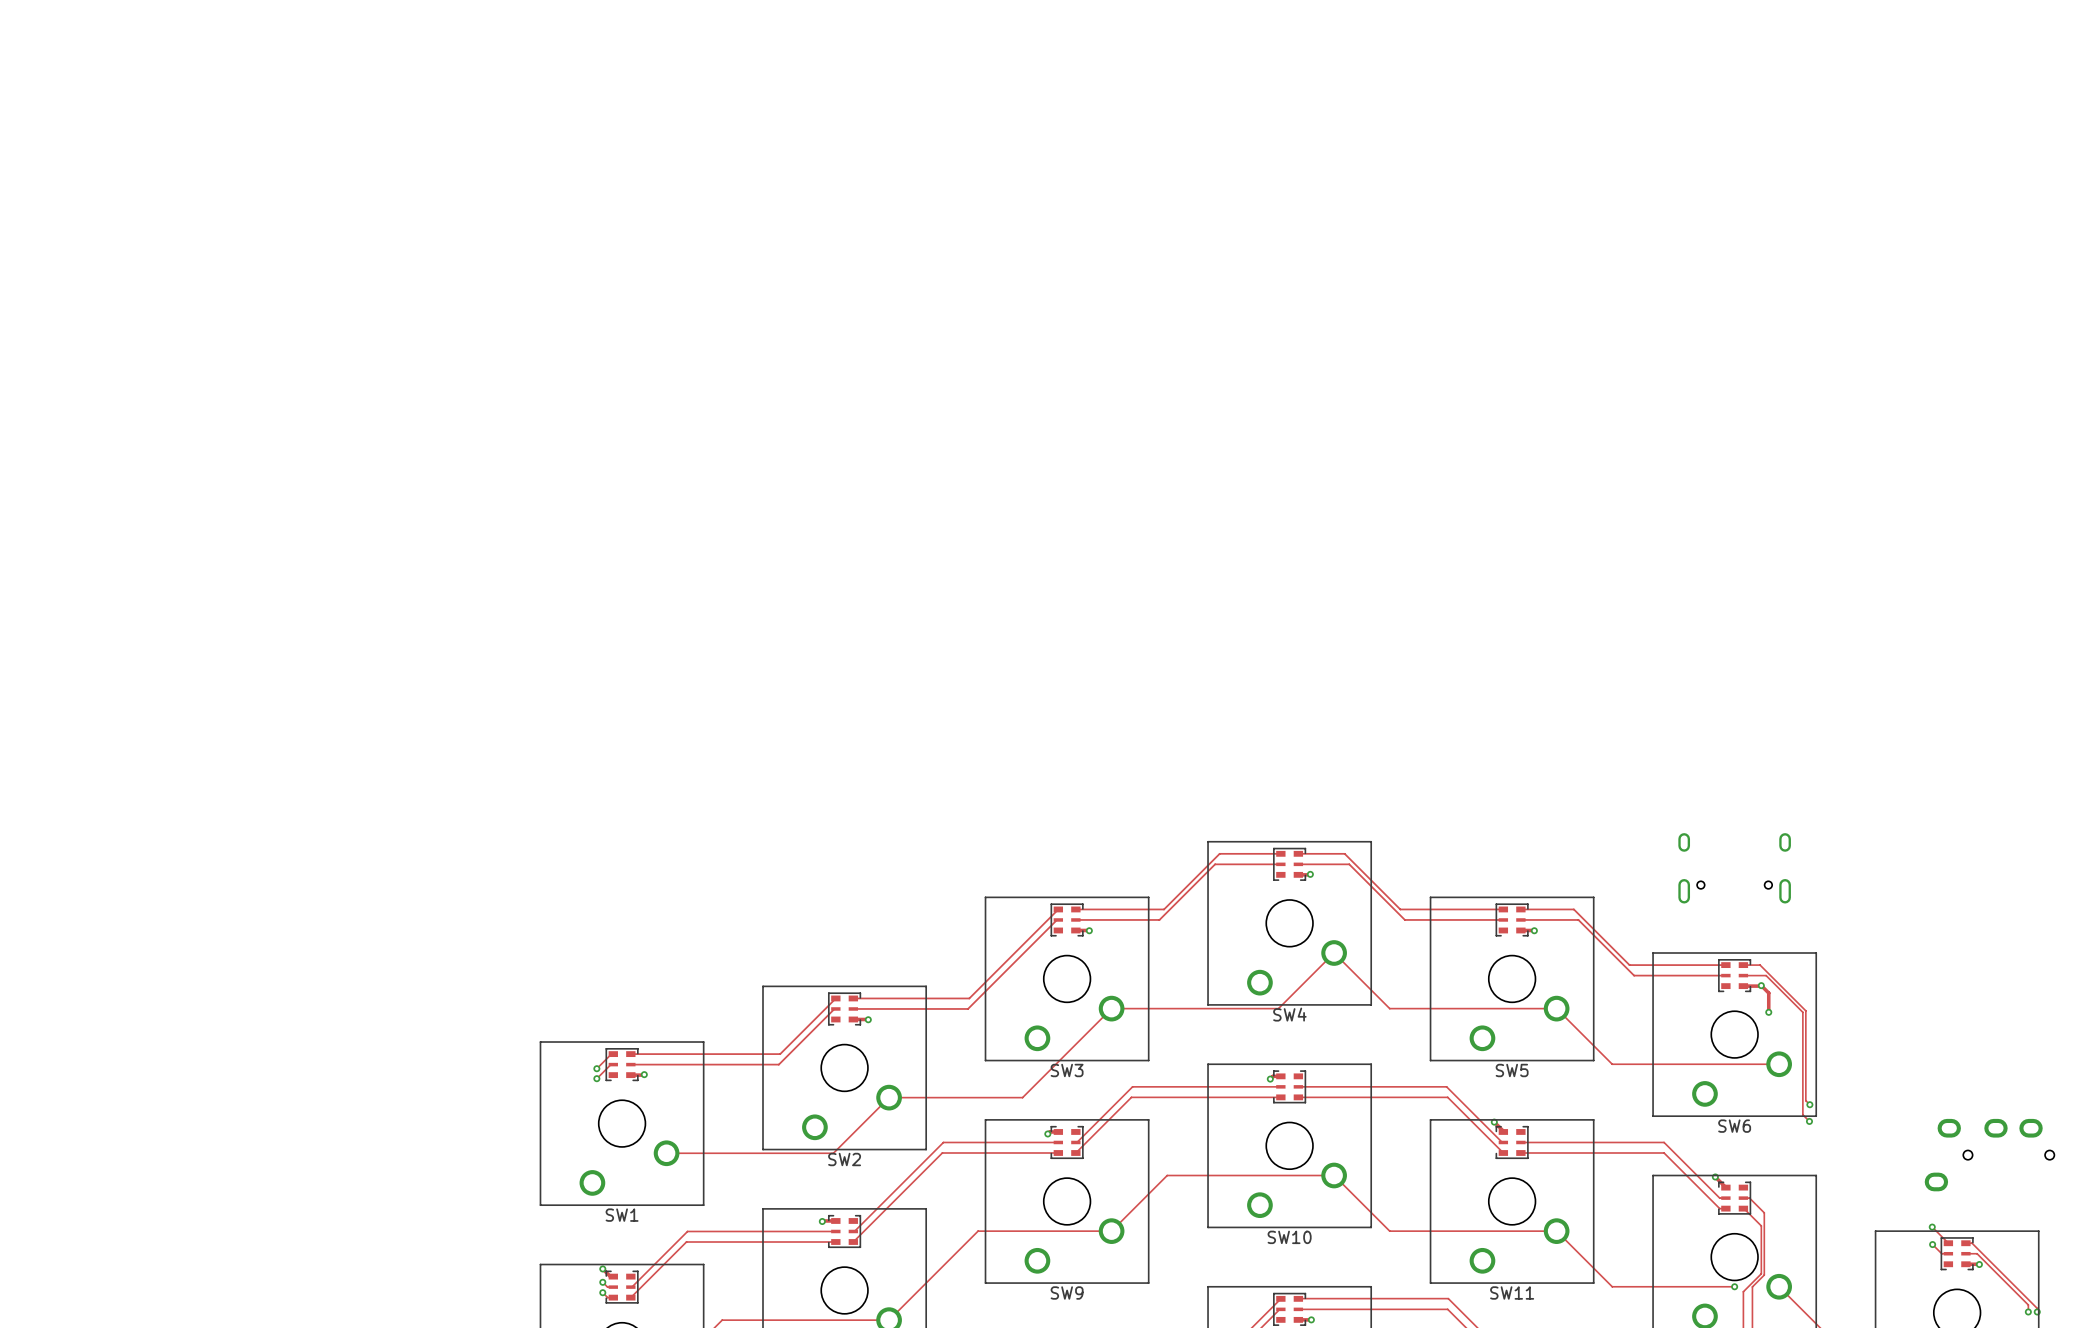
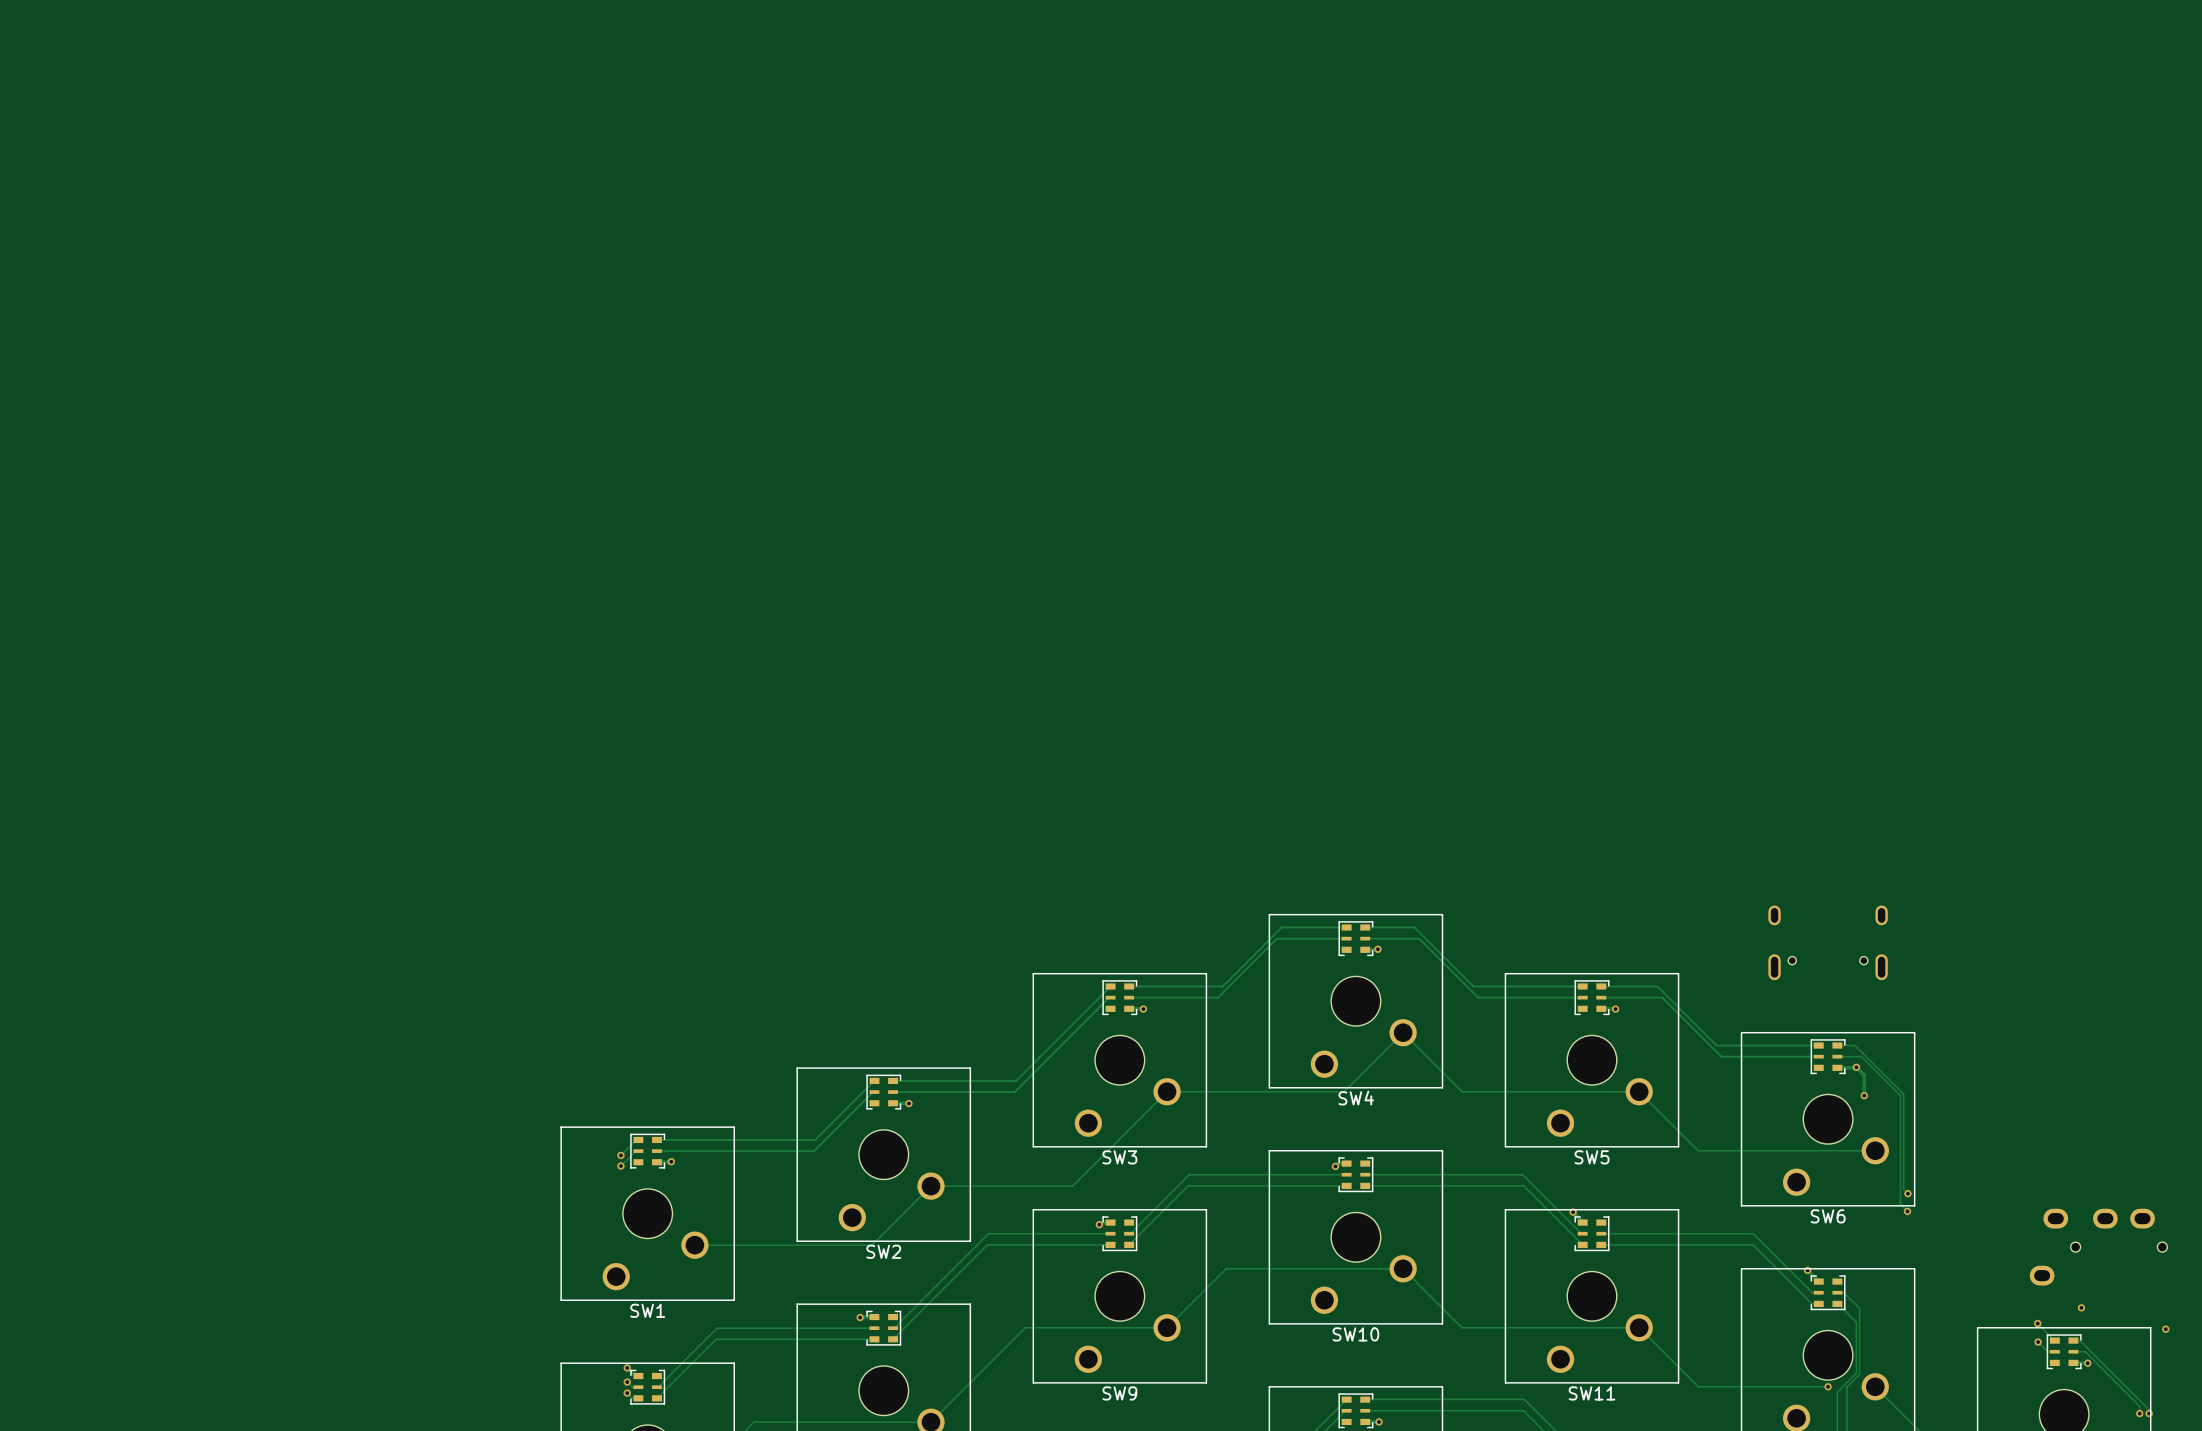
via: none -> (2081, 1307)
via: none -> (2165, 1329)

